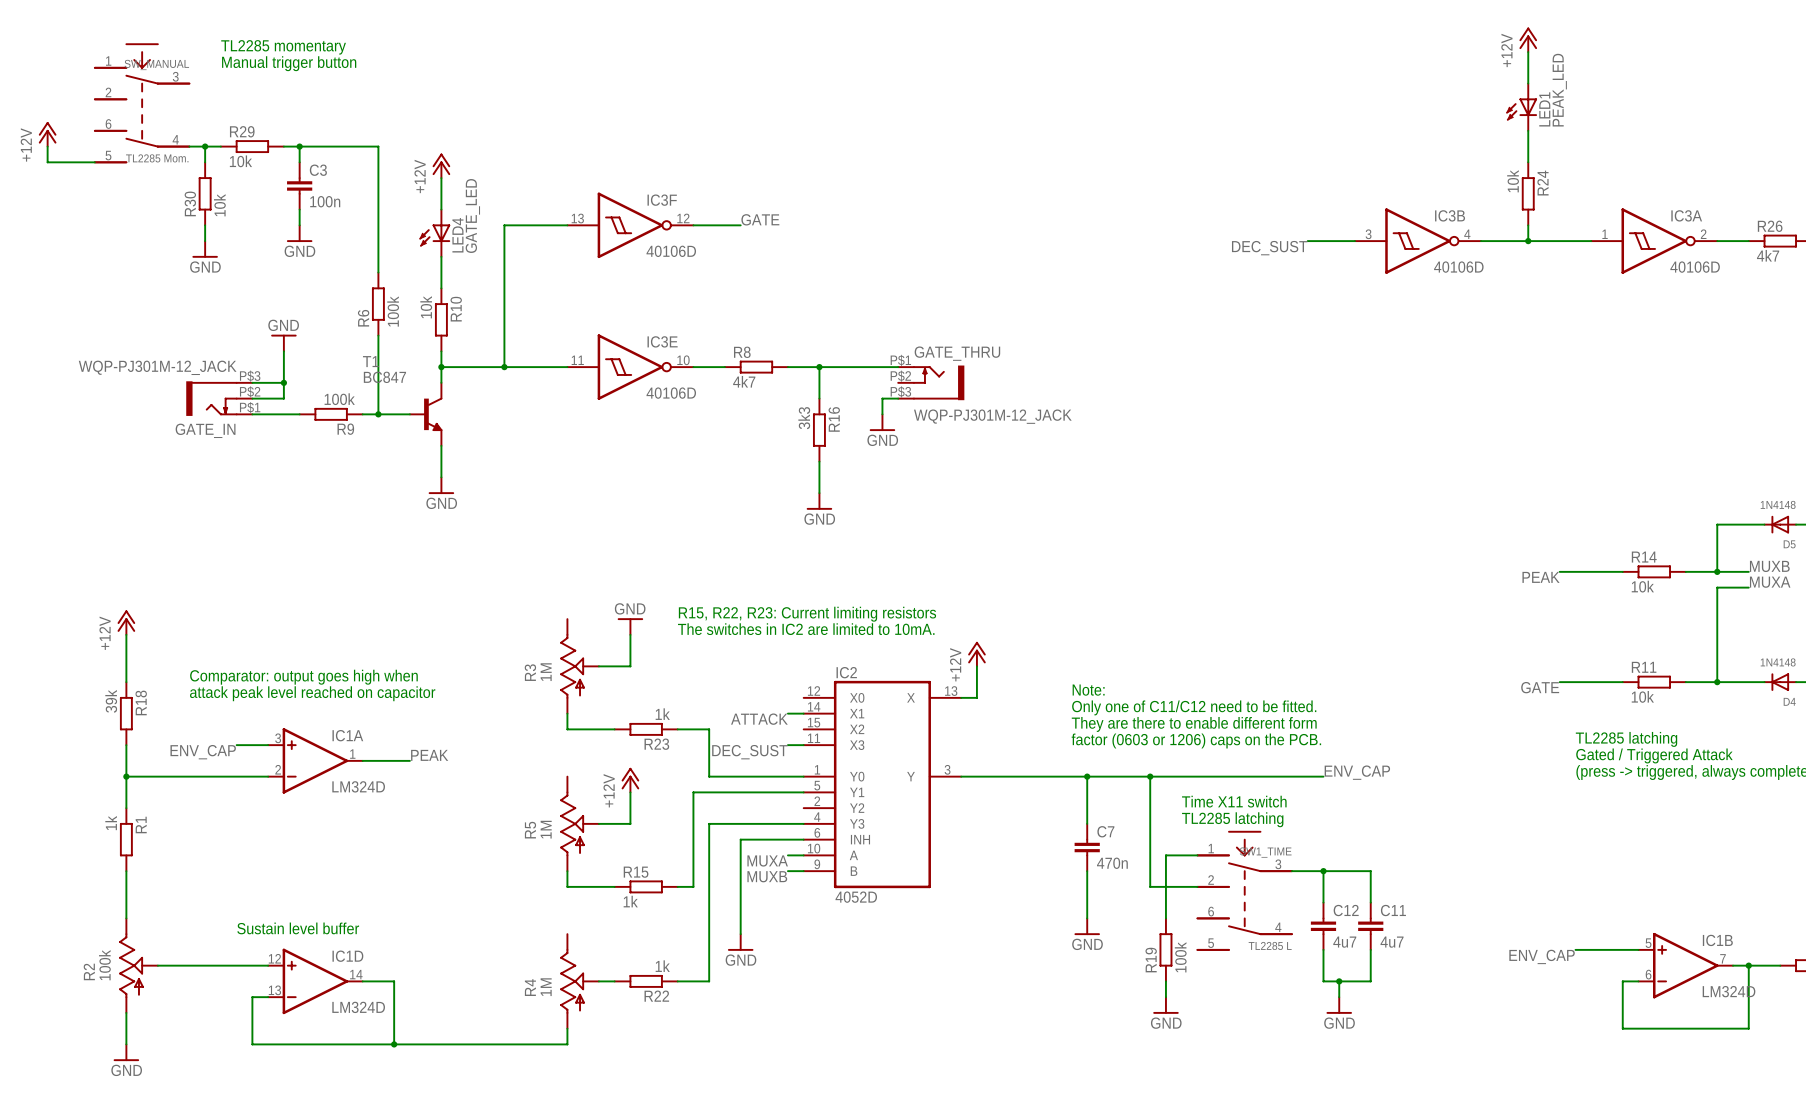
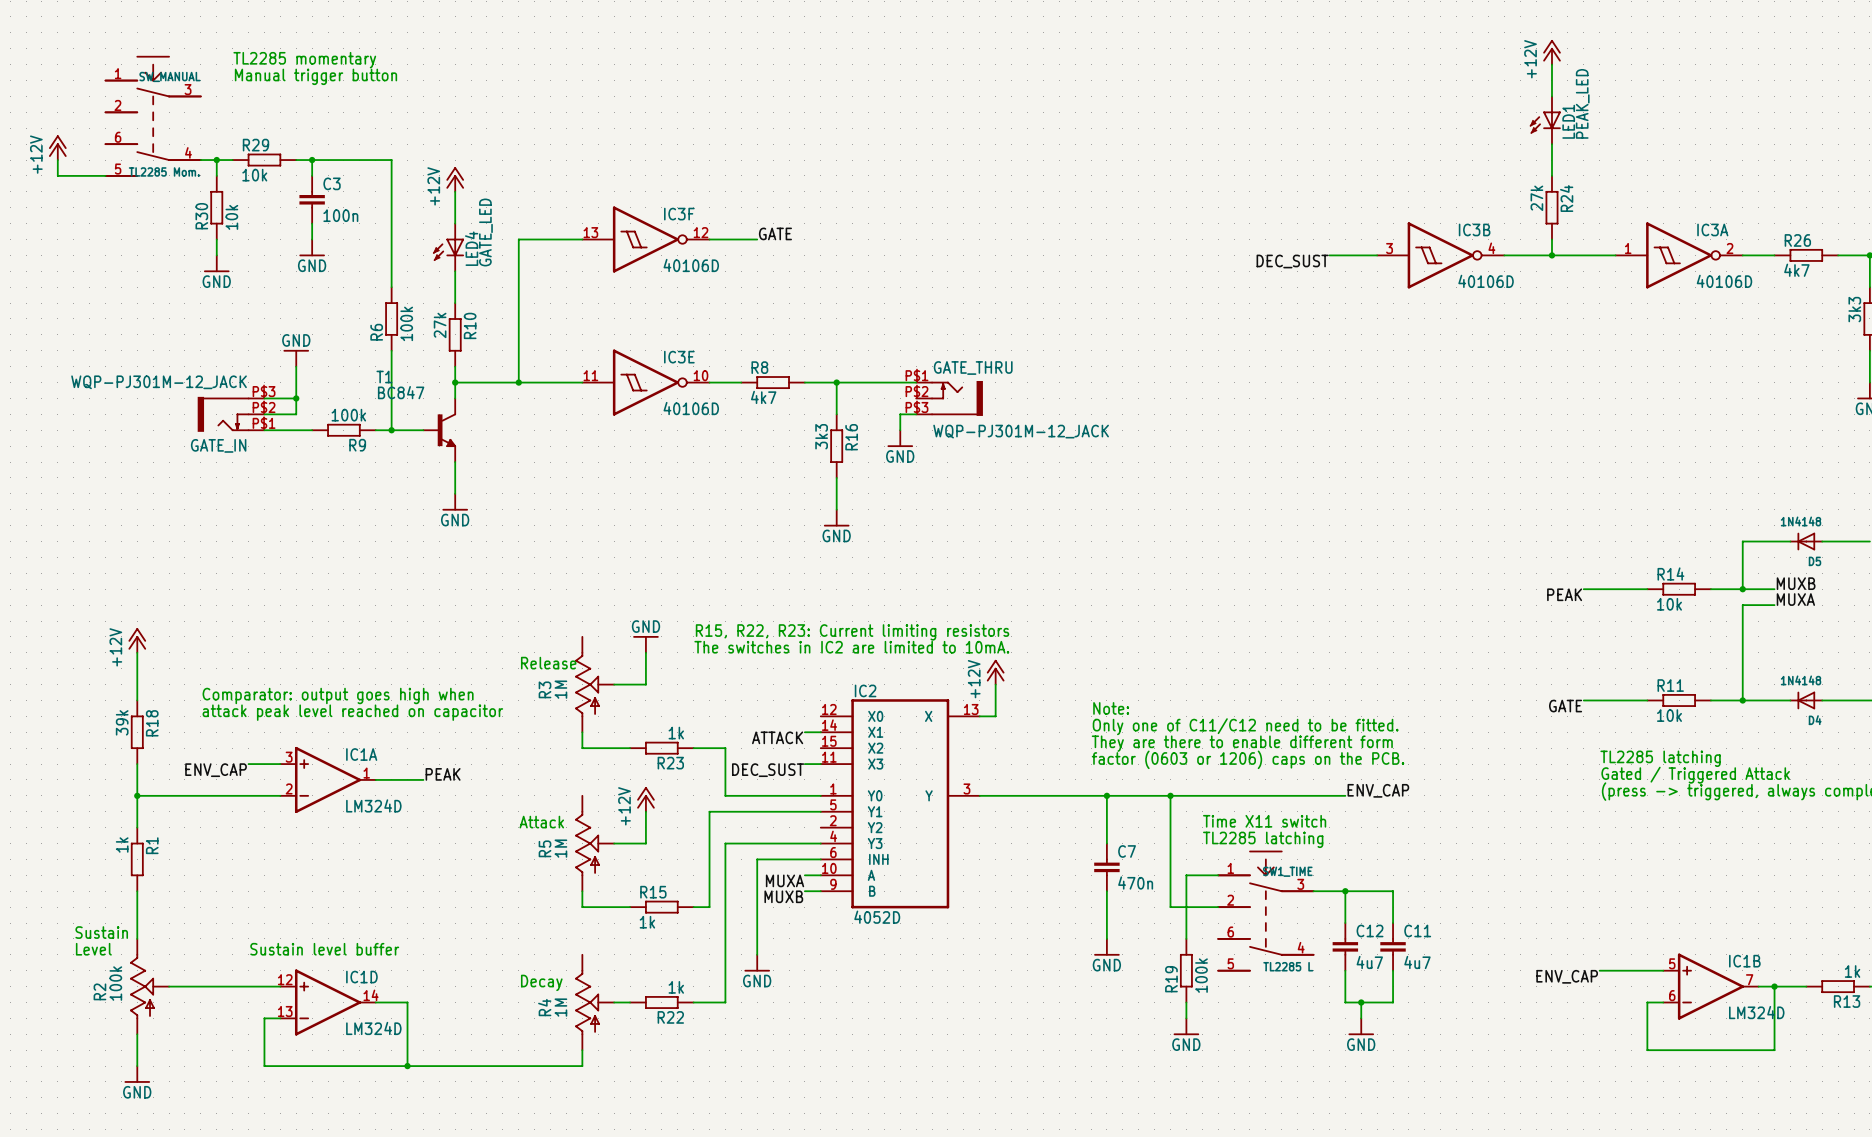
R24 value: 10k (1513, 181) -> 27k (1536, 198)
R10 value: 10k (426, 307) -> 27k (440, 325)
text: none -> Release (548, 663)
text: none -> Attack (541, 822)
text: none -> Sustain (101, 932)
text: none -> Level (93, 949)
text: none -> Decay (541, 982)

